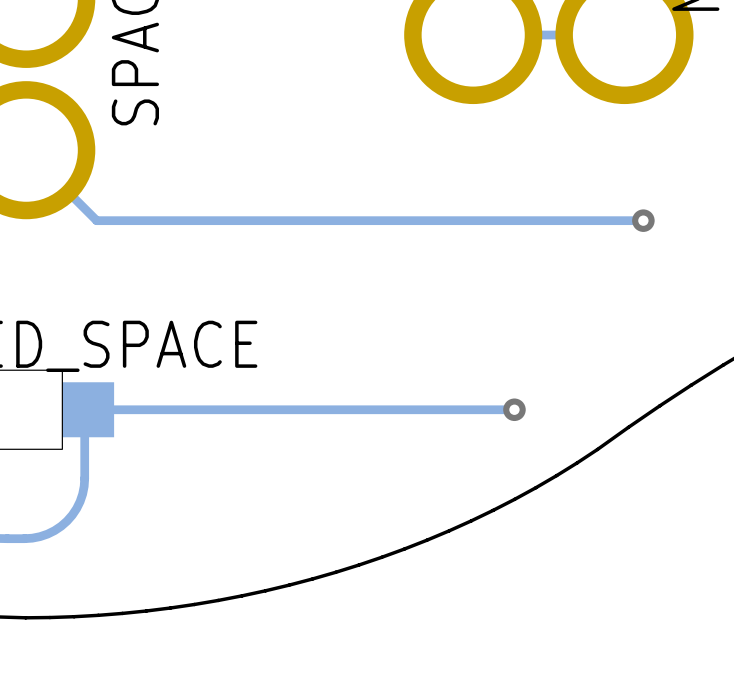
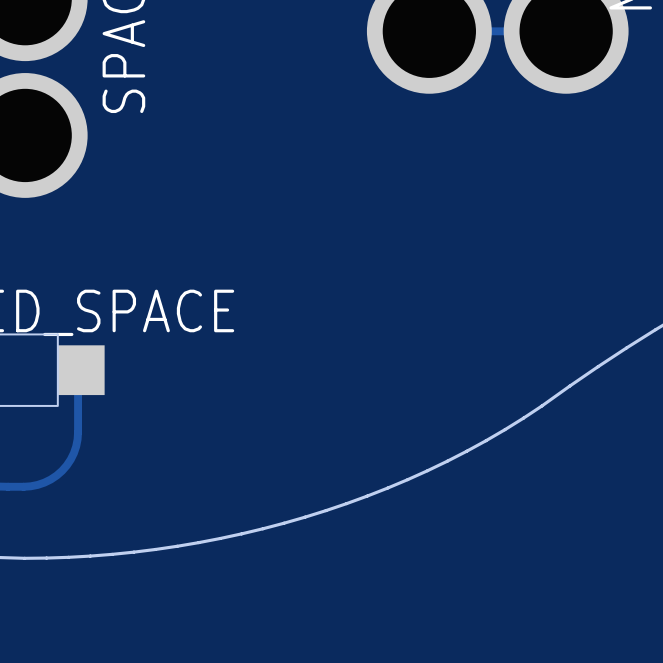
track: (26, 150) (96, 220) (643, 220) -> none
via: (643, 220) -> none
track: (514, 409) (88, 409) -> none
via: (514, 409) -> none

